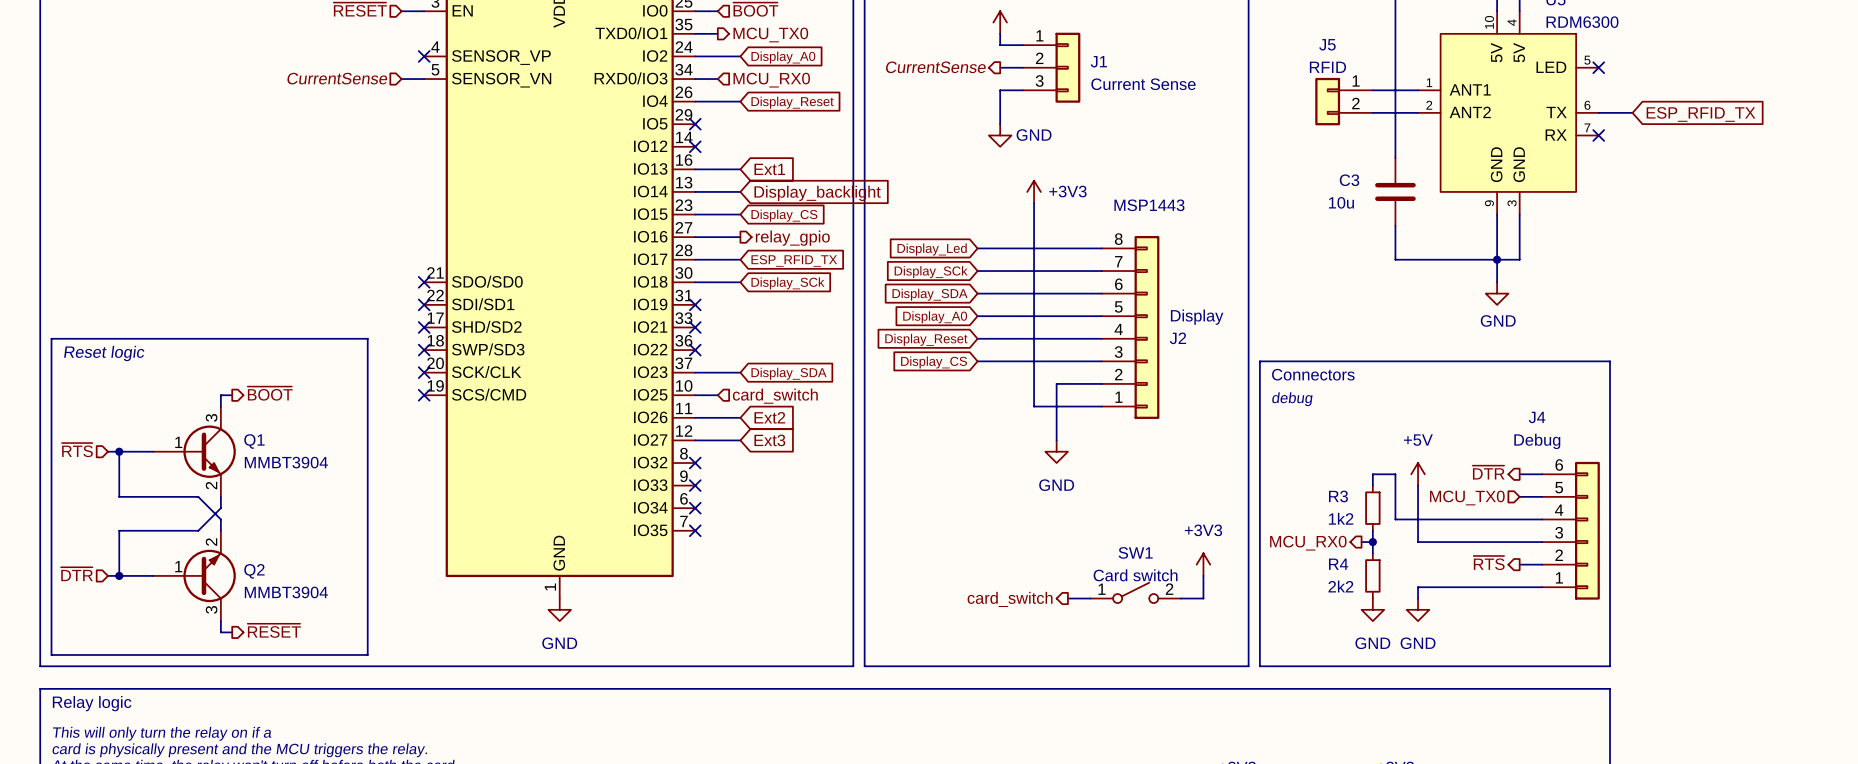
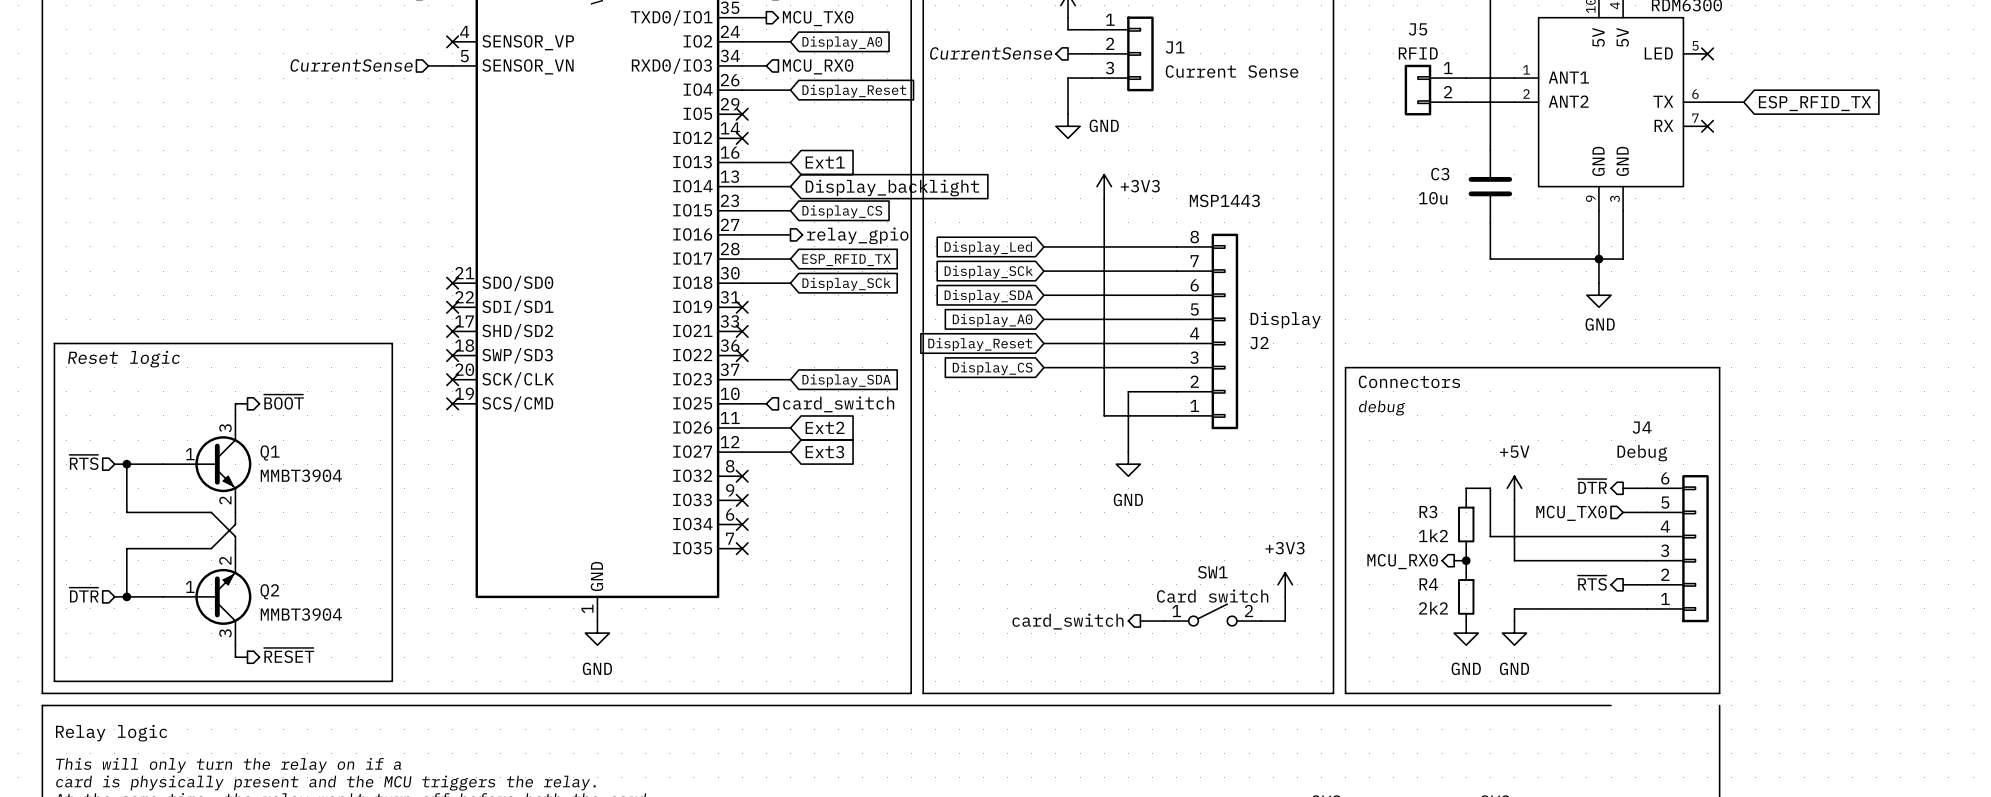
line: none -> (1719, 705) (1719, 717)
line: (40, 688) (1610, 688) -> (42, 717) (42, 705) (1611, 705)

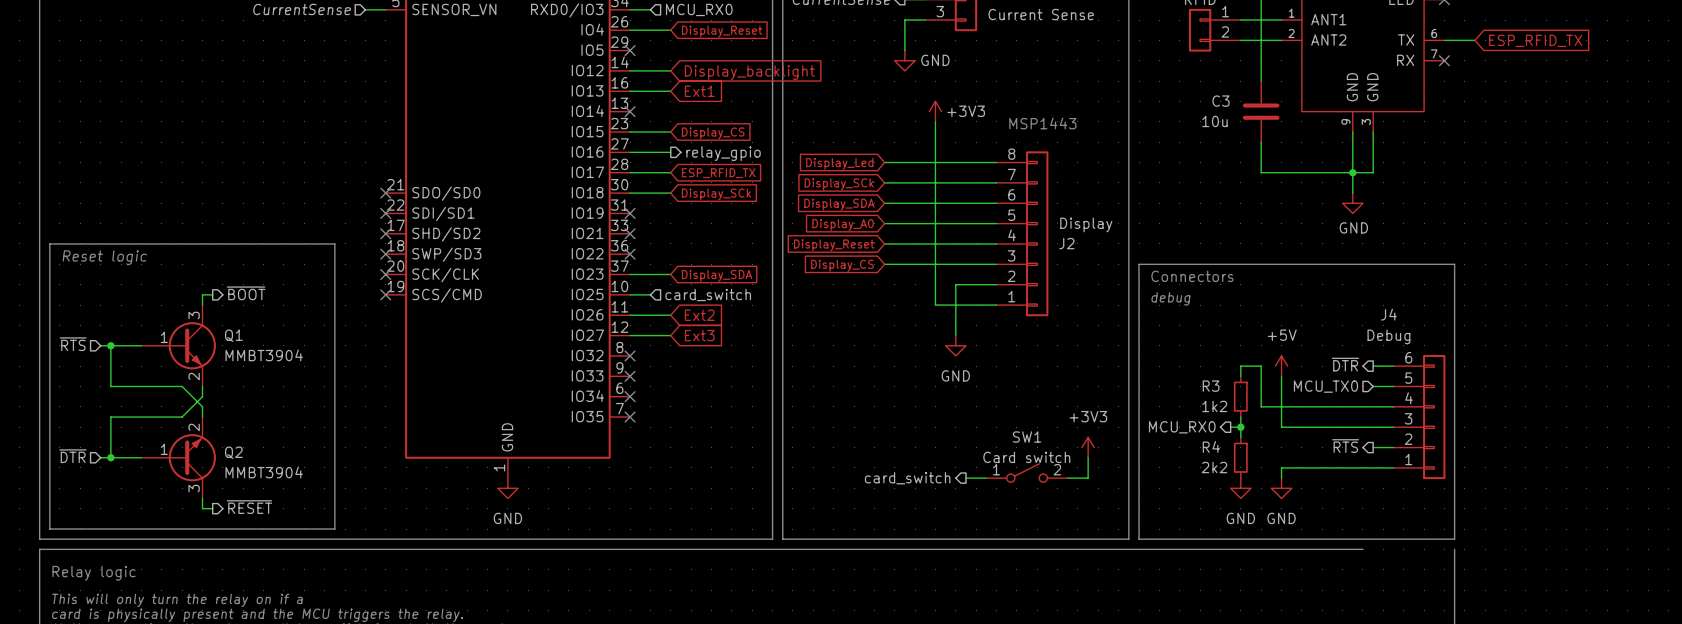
no-connect mark position: (742, 138) -> (630, 111)
wire: (742, 186) (790, 186) -> (630, 70) (670, 70)
global label position: Display_backlight (892, 188) -> Display_backlight (749, 72)

